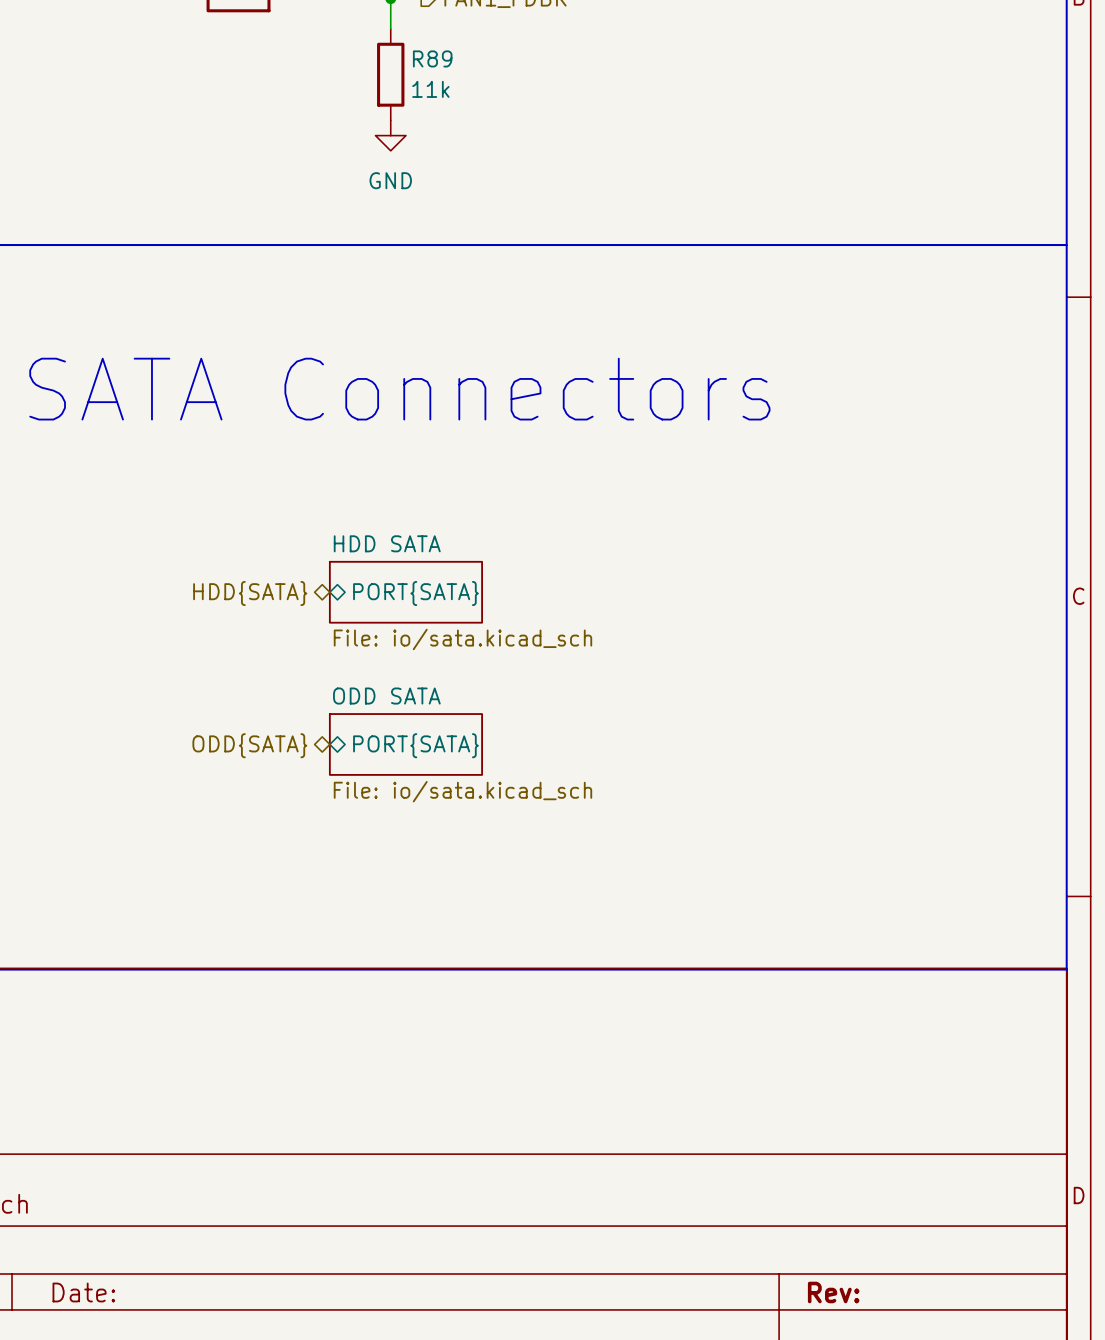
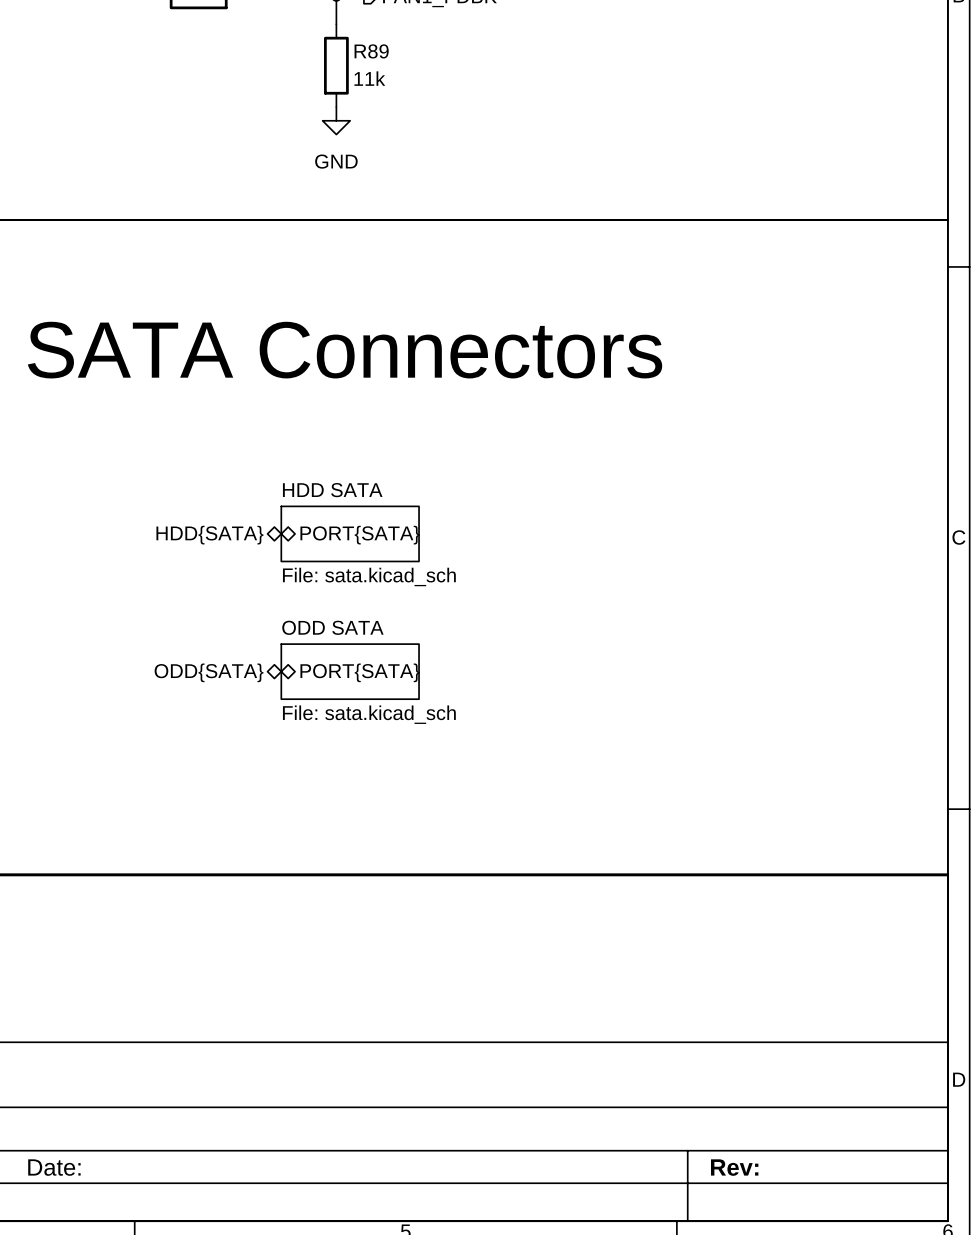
sheet HDD SATA value: File: io/sata.kicad_sch (462, 639) -> File: sata.kicad_sch (369, 576)
sheet ODD SATA value: File: io/sata.kicad_sch (462, 791) -> File: sata.kicad_sch (369, 714)

